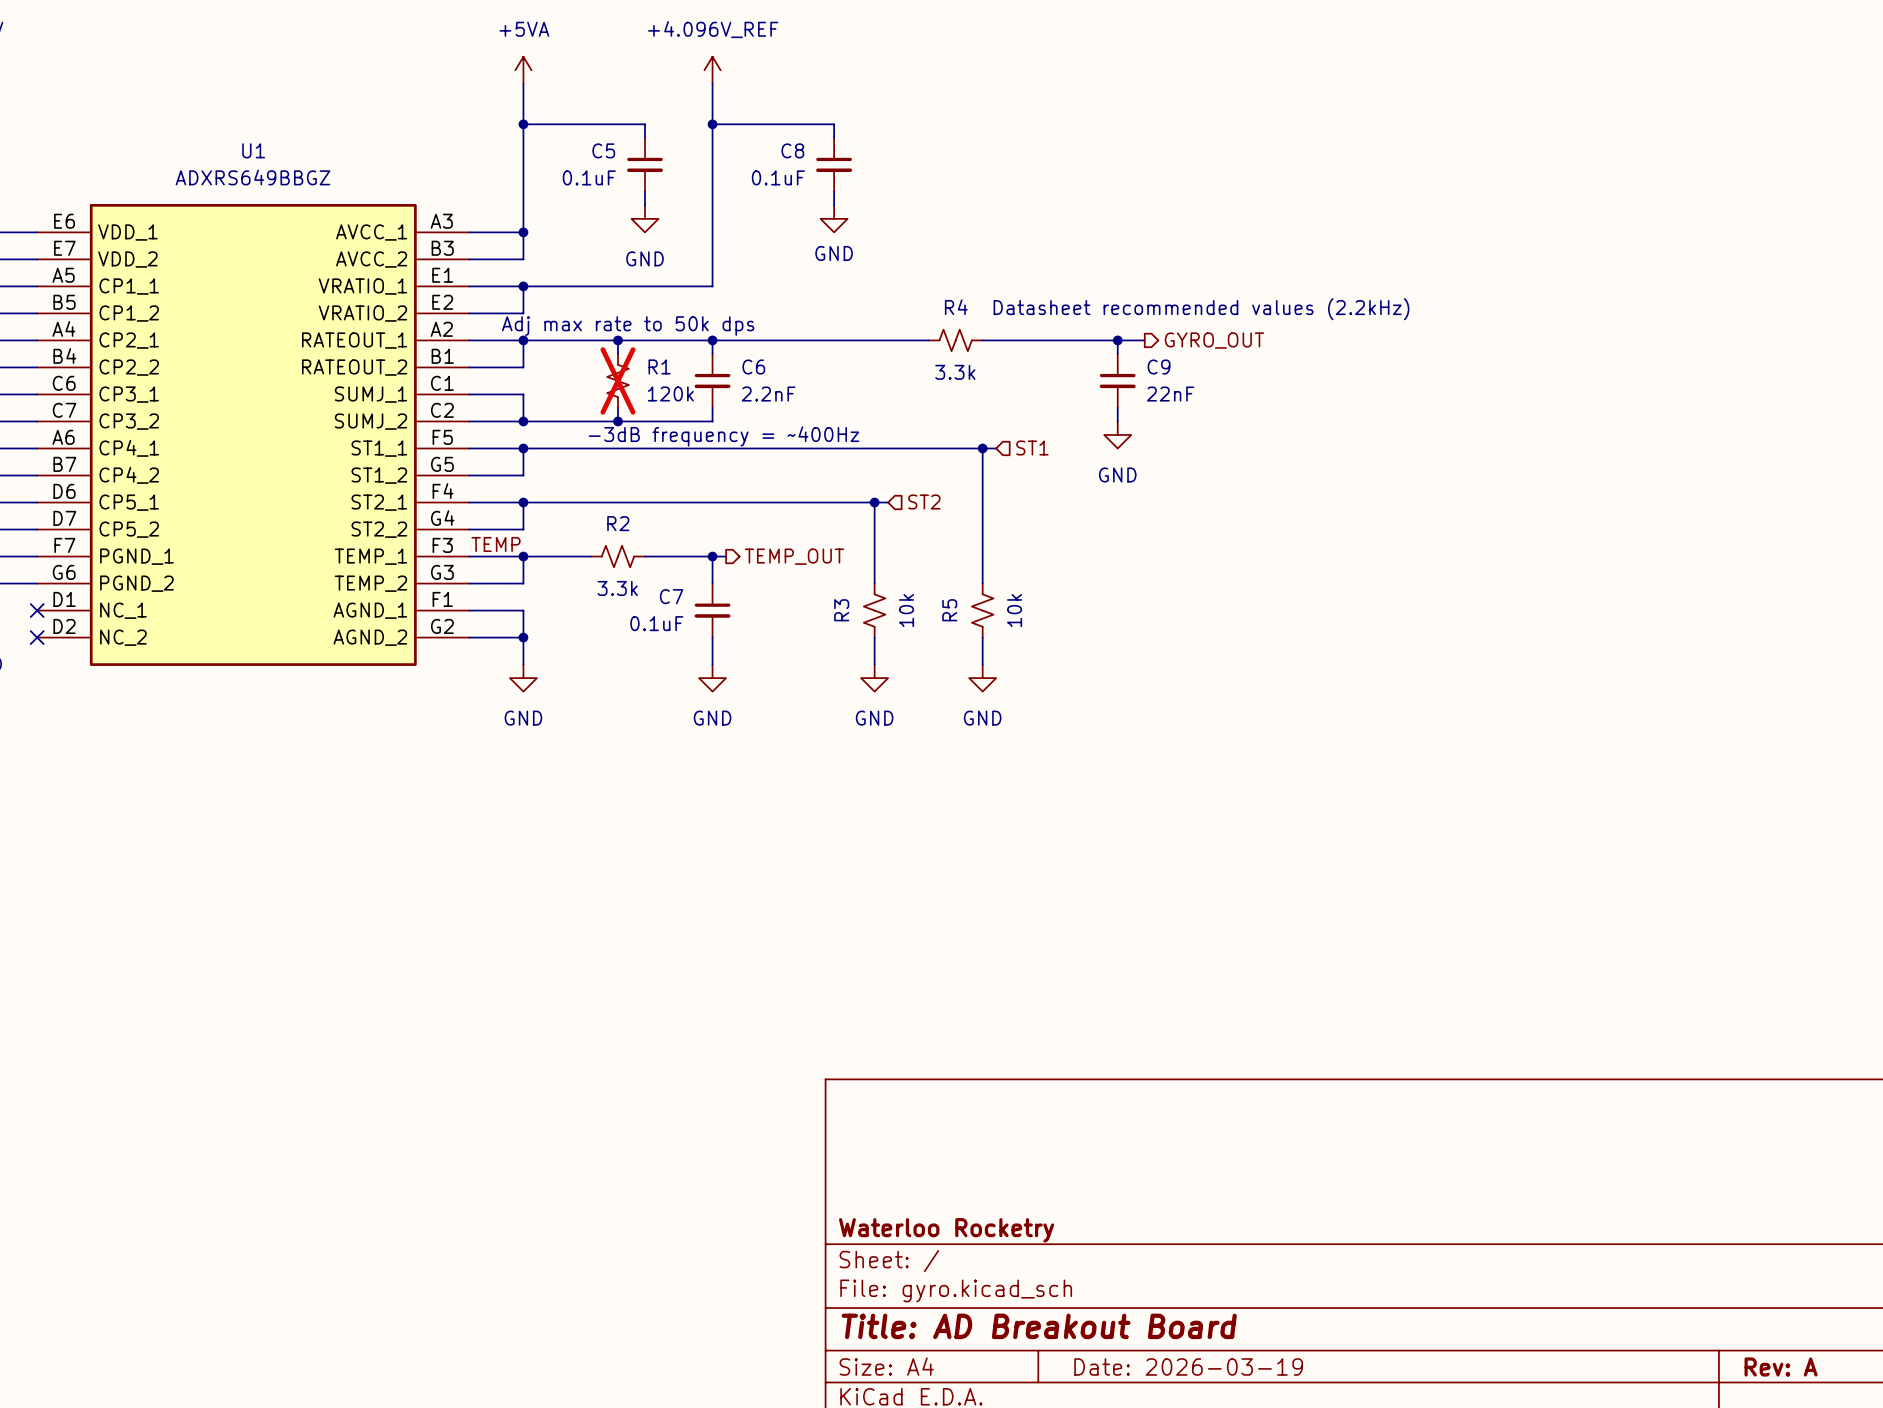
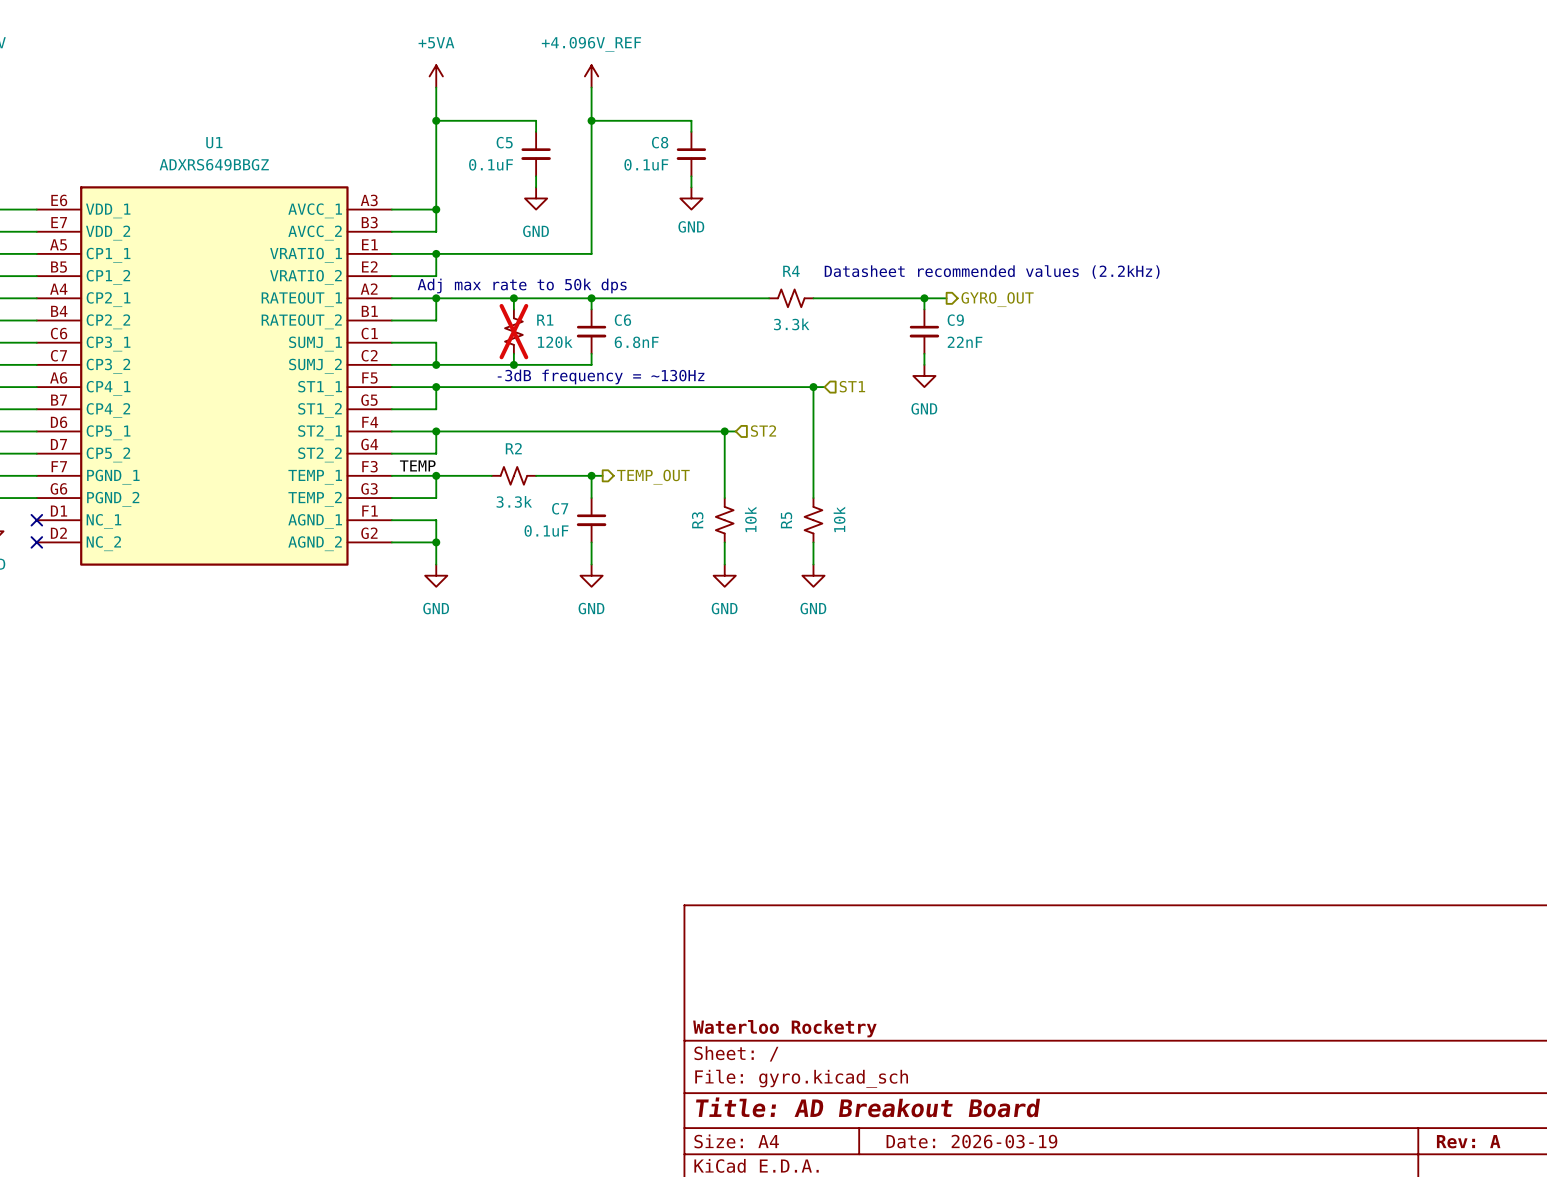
C6 value: 2.2nF (768, 394) -> 6.8nF (636, 342)
text: -3dB frequency = ~400Hz (723, 436) -> -3dB frequency = ~130Hz (601, 376)

